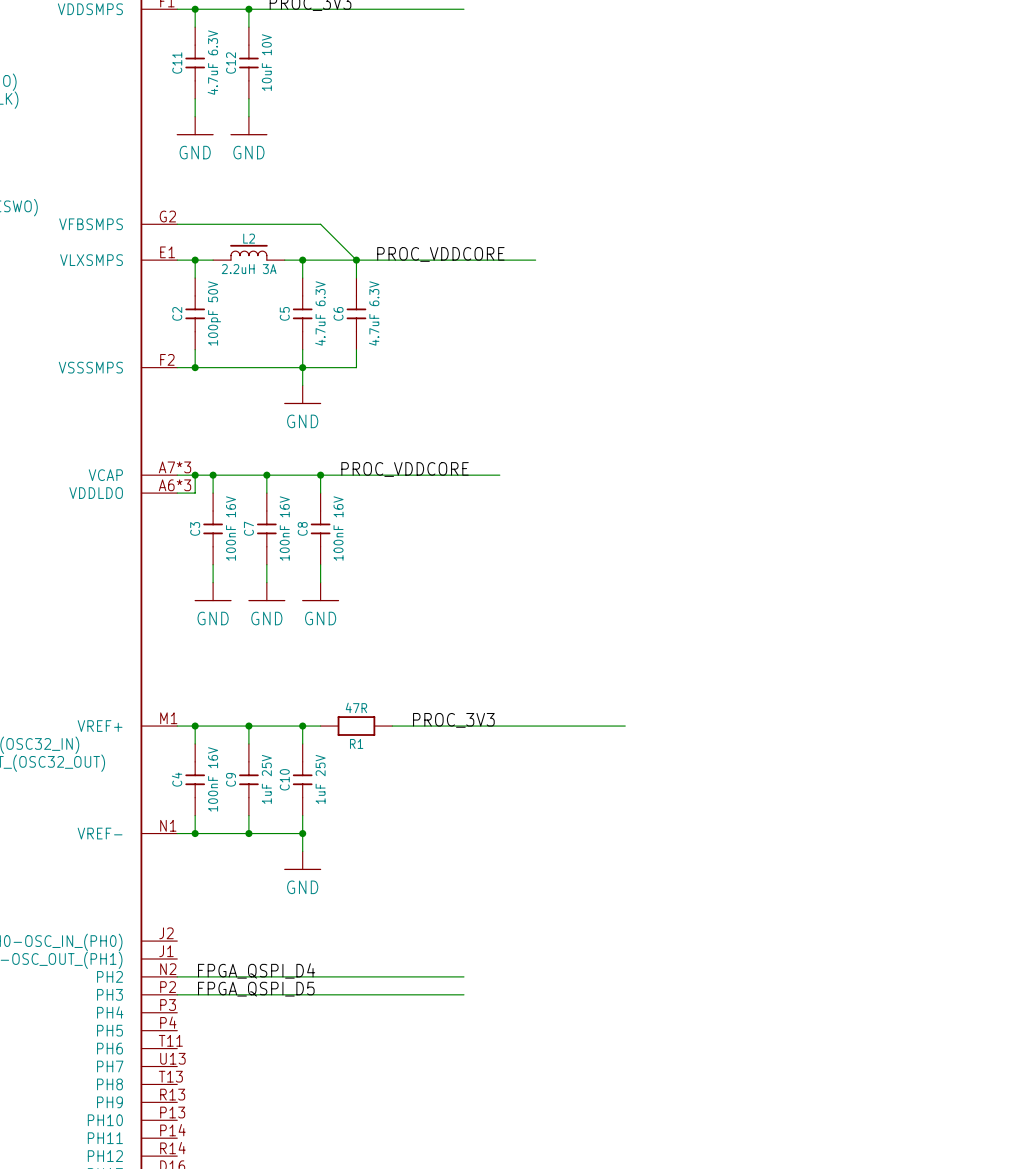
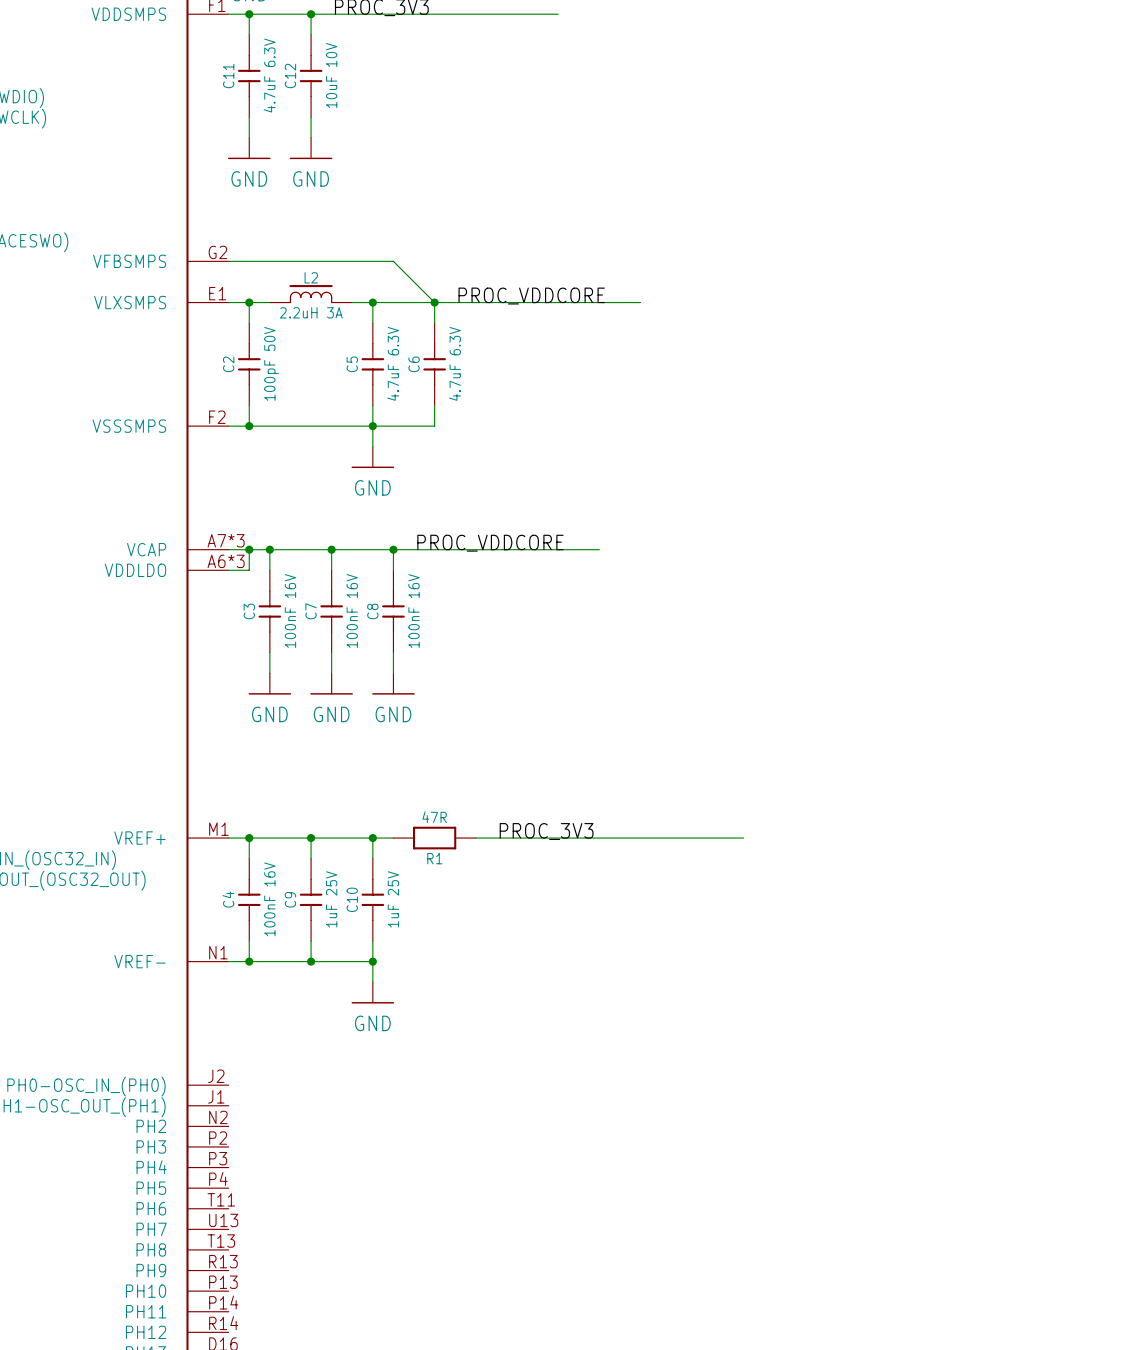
label: FPGA_QSPI_D4 (256, 970) -> none
wire: (177, 976) (463, 976) -> none
label: FPGA_QSPI_D5 (256, 989) -> none
wire: (177, 994) (463, 994) -> none

